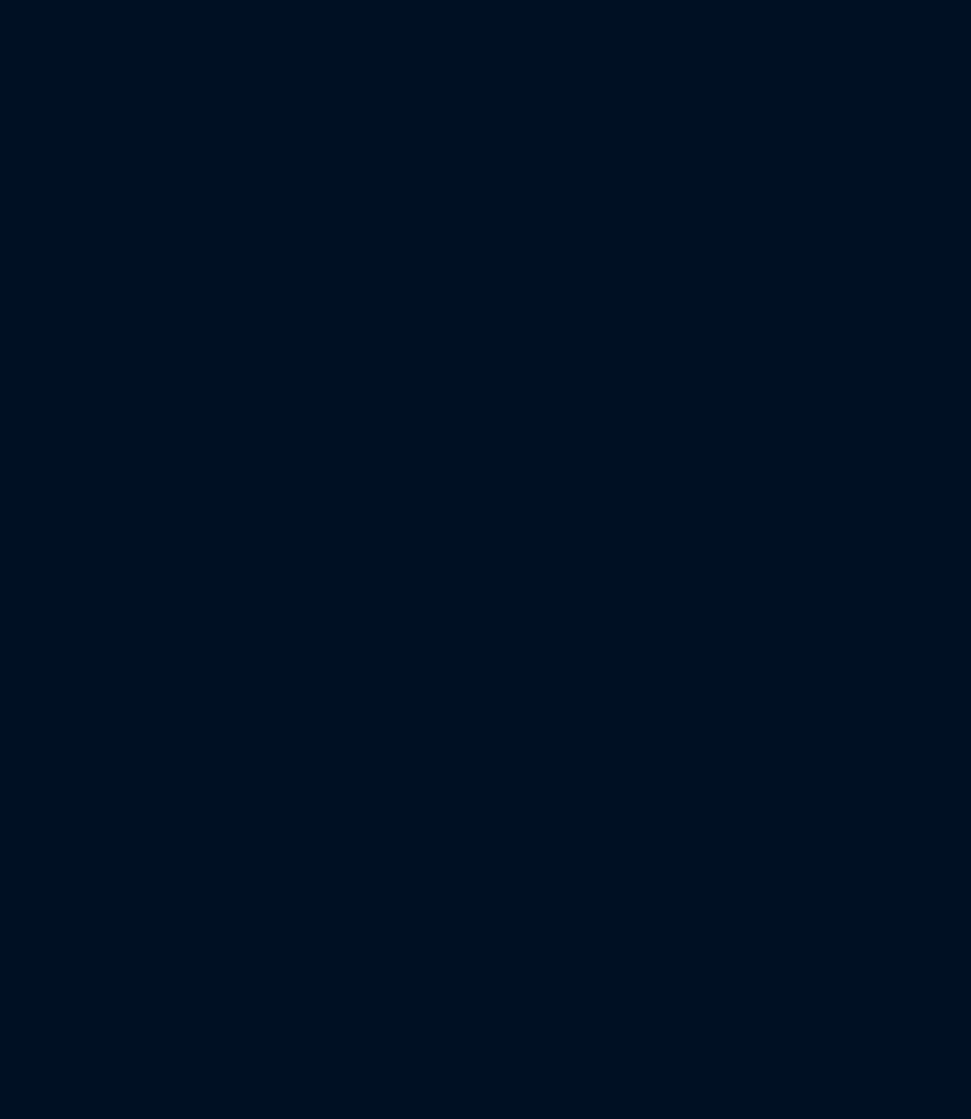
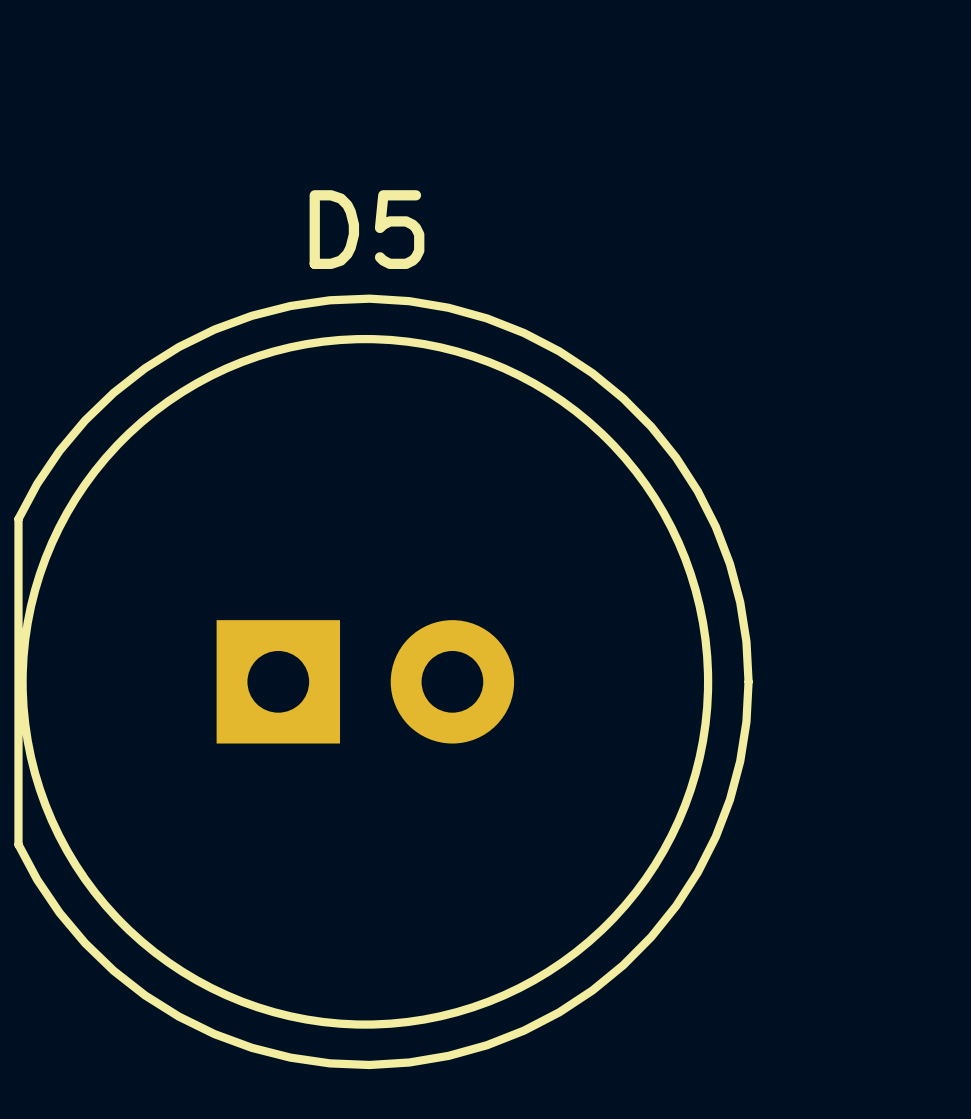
D5: none -> (383, 681)

